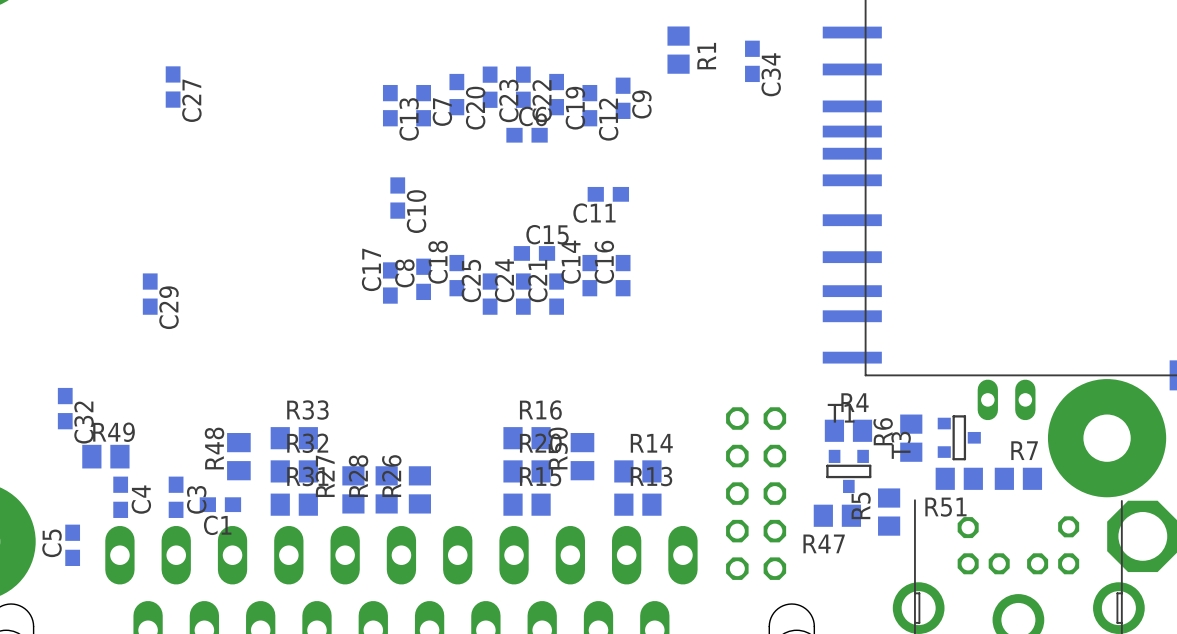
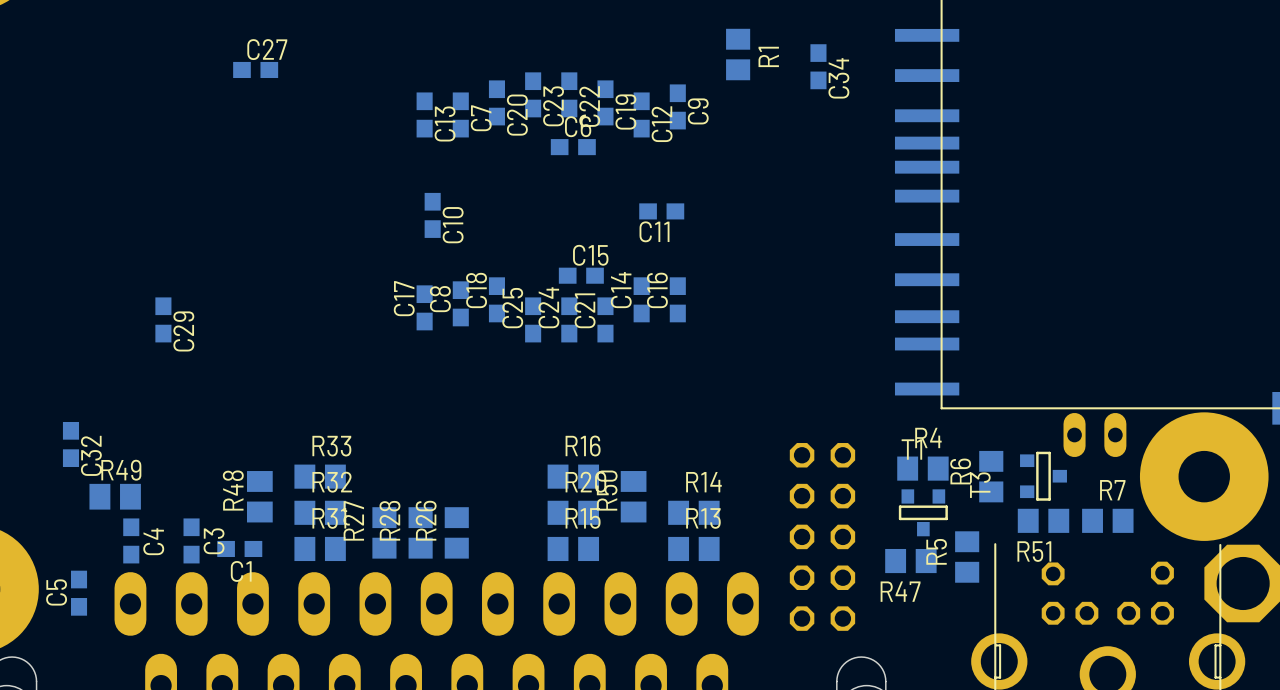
C27 rotation: 0° (173, 87) -> 90° clockwise (255, 69)
C27 position: (173, 87) -> (255, 69)
C27 name position: C27 (191, 100) -> C27 (267, 49)

